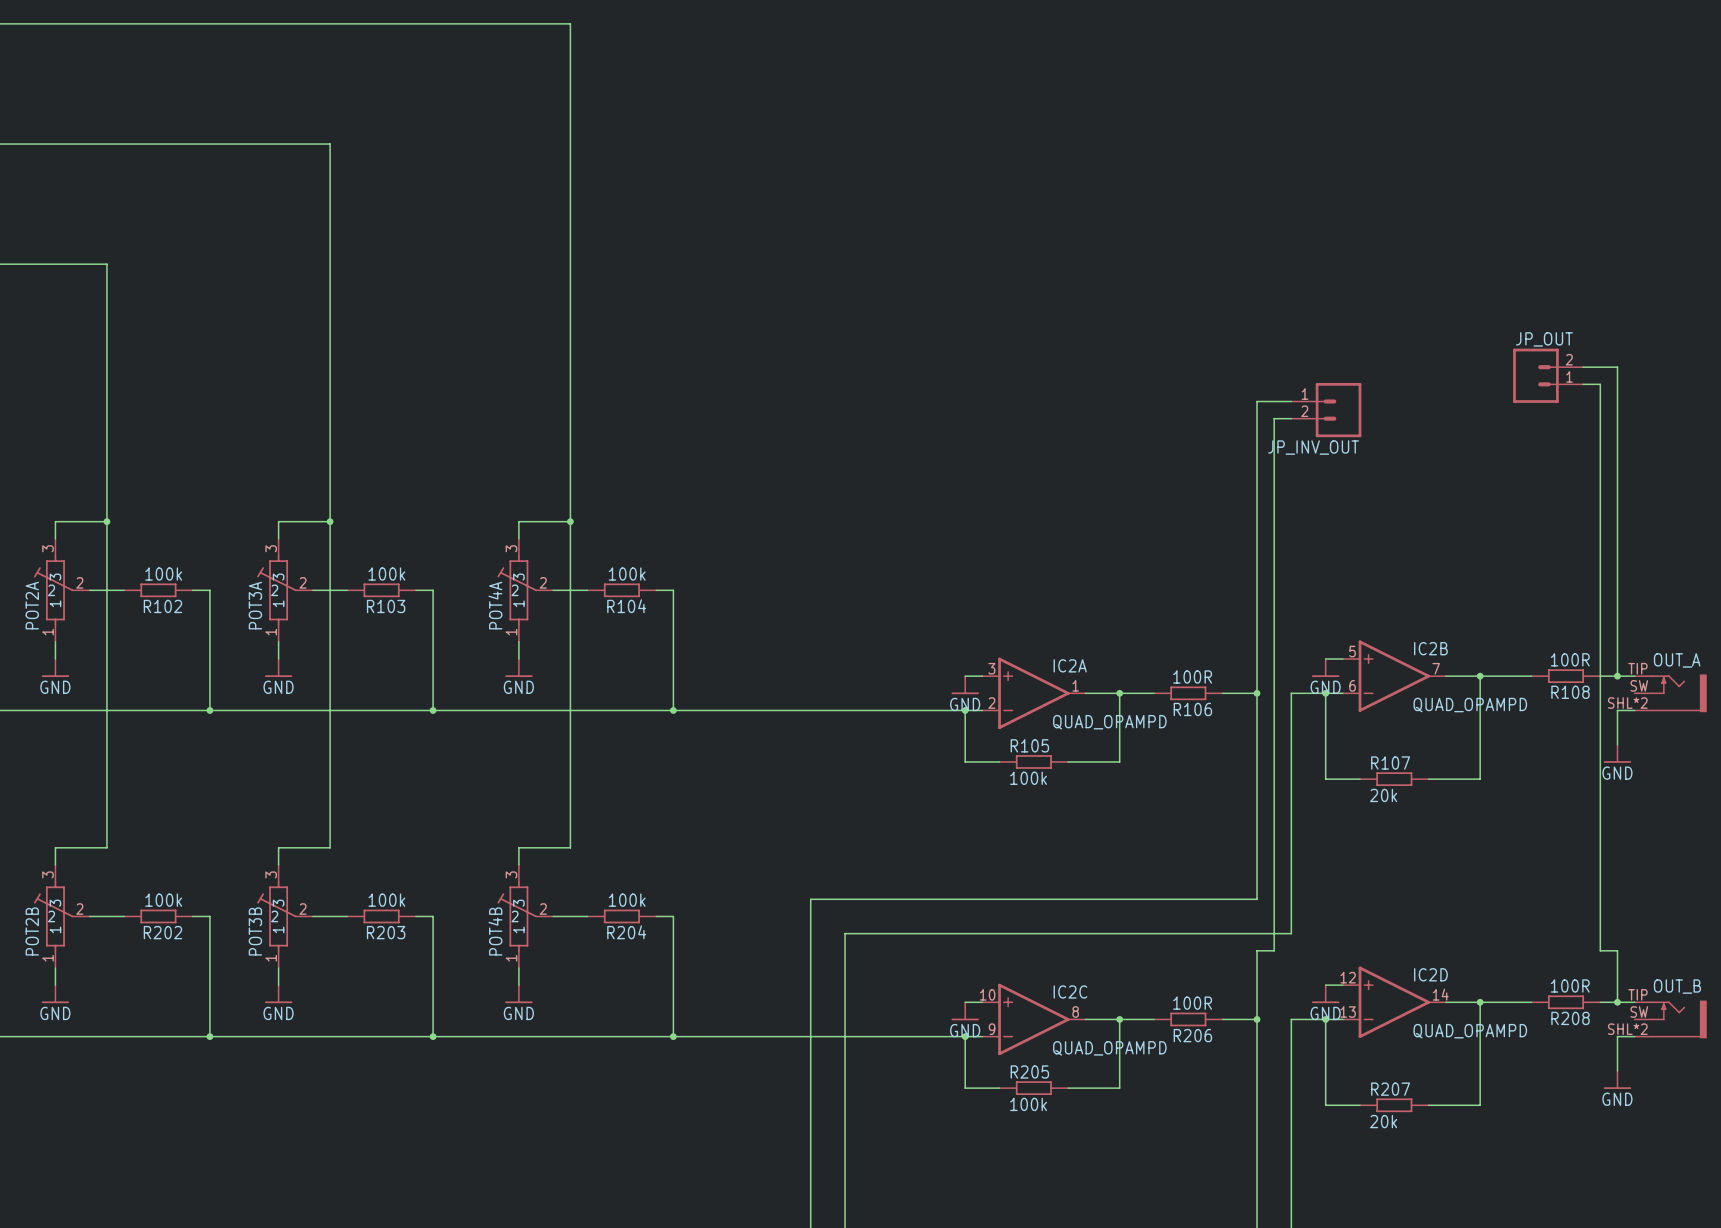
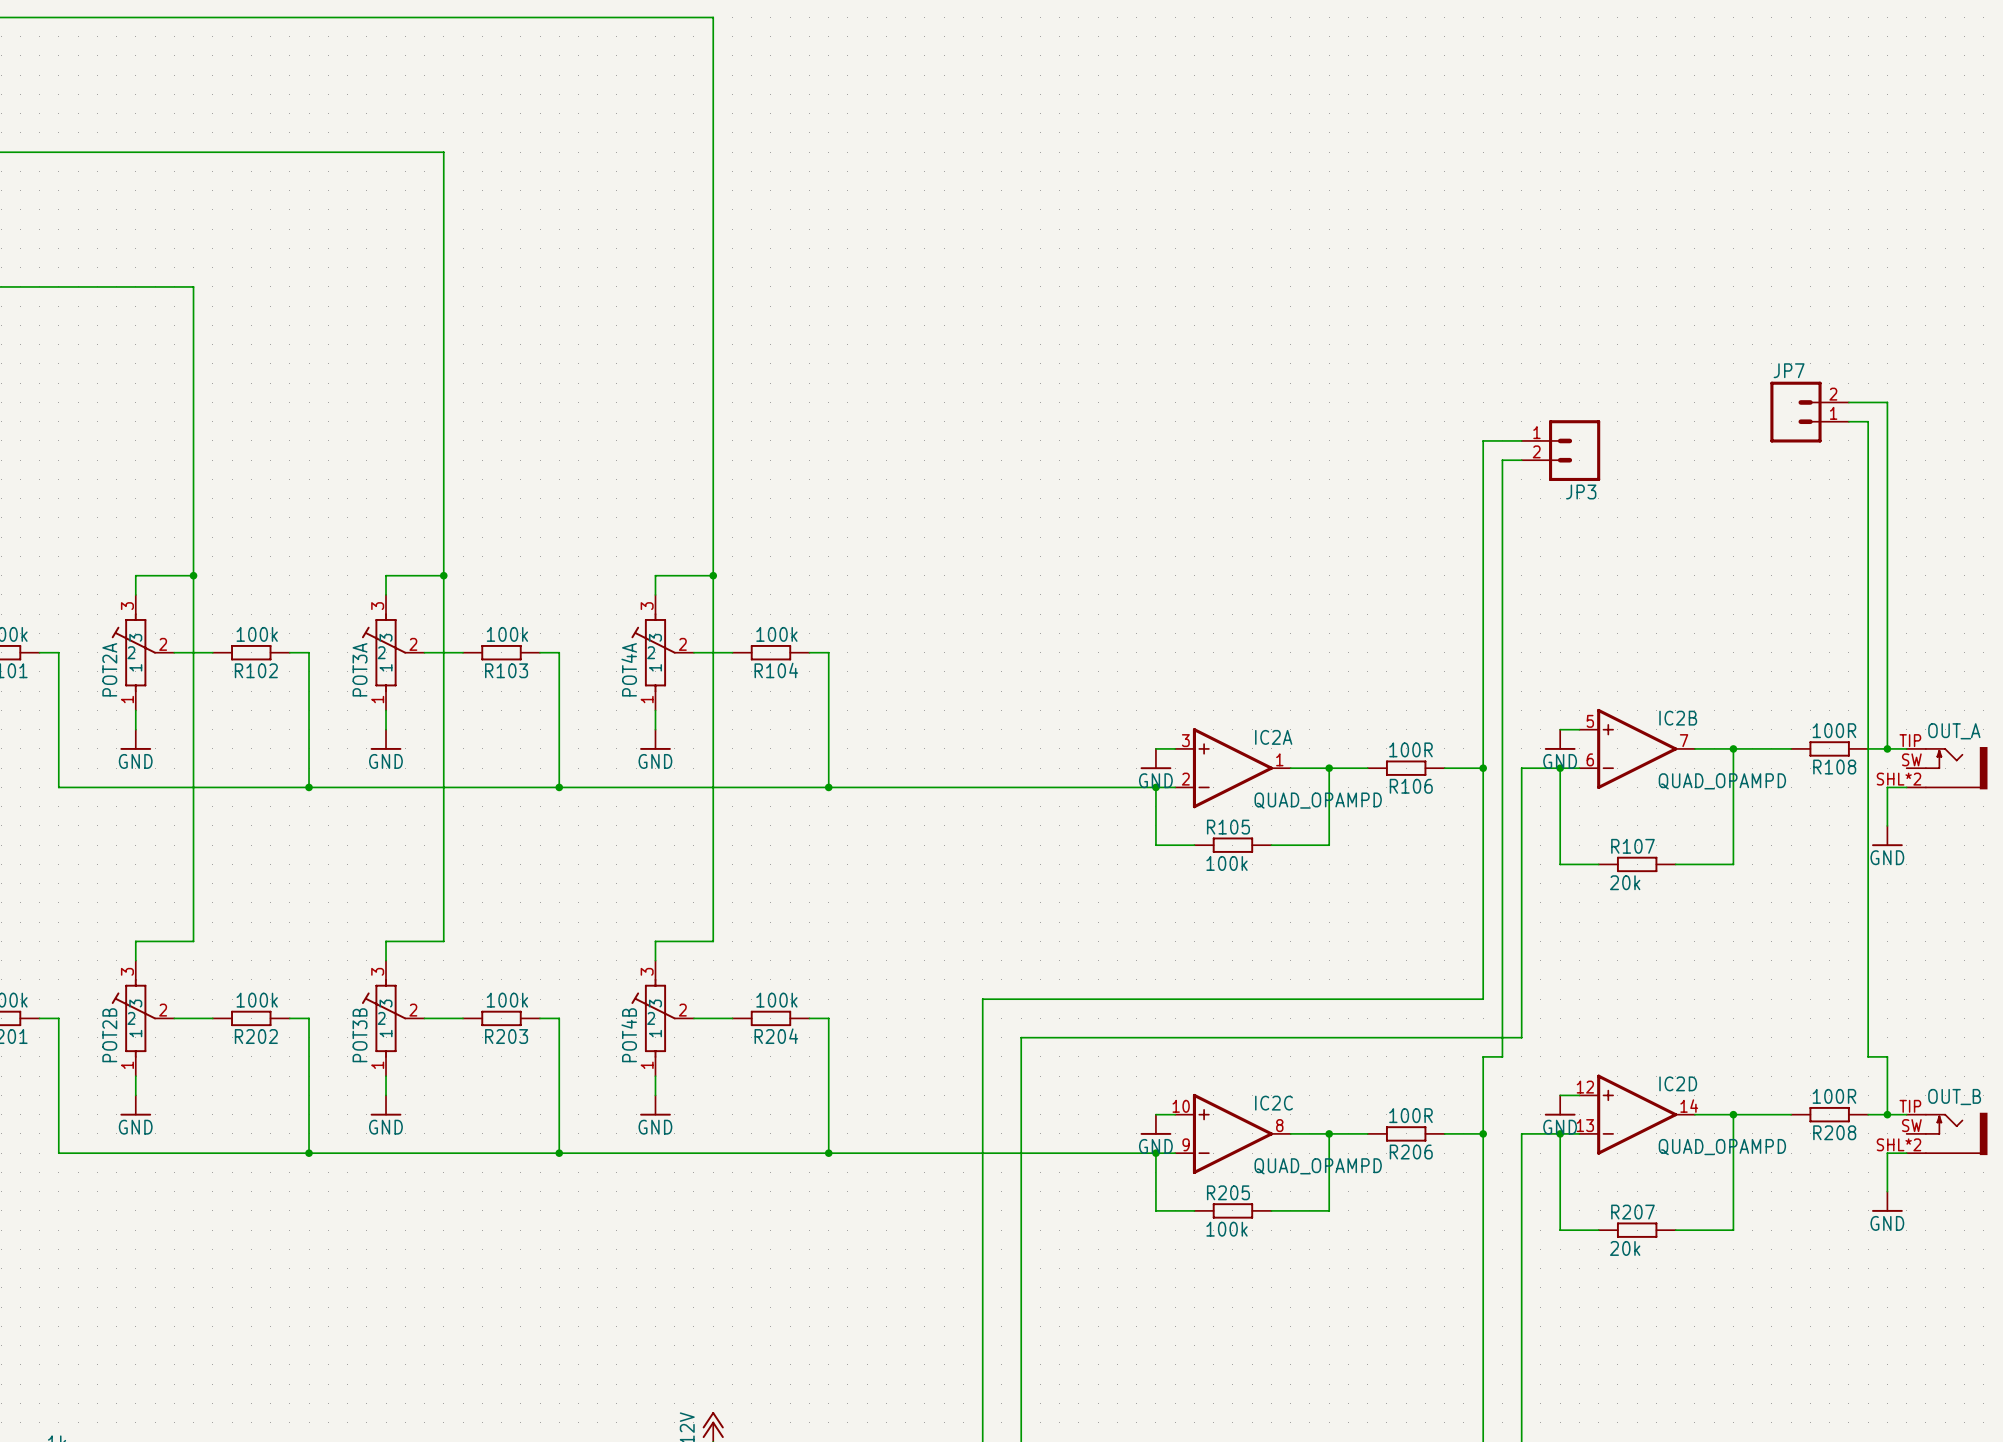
JP_OUT name: JP_OUT (1544, 339) -> JP7 (1789, 370)
JP_INV_OUT name: JP_INV_OUT (1313, 447) -> JP3 (1581, 491)

